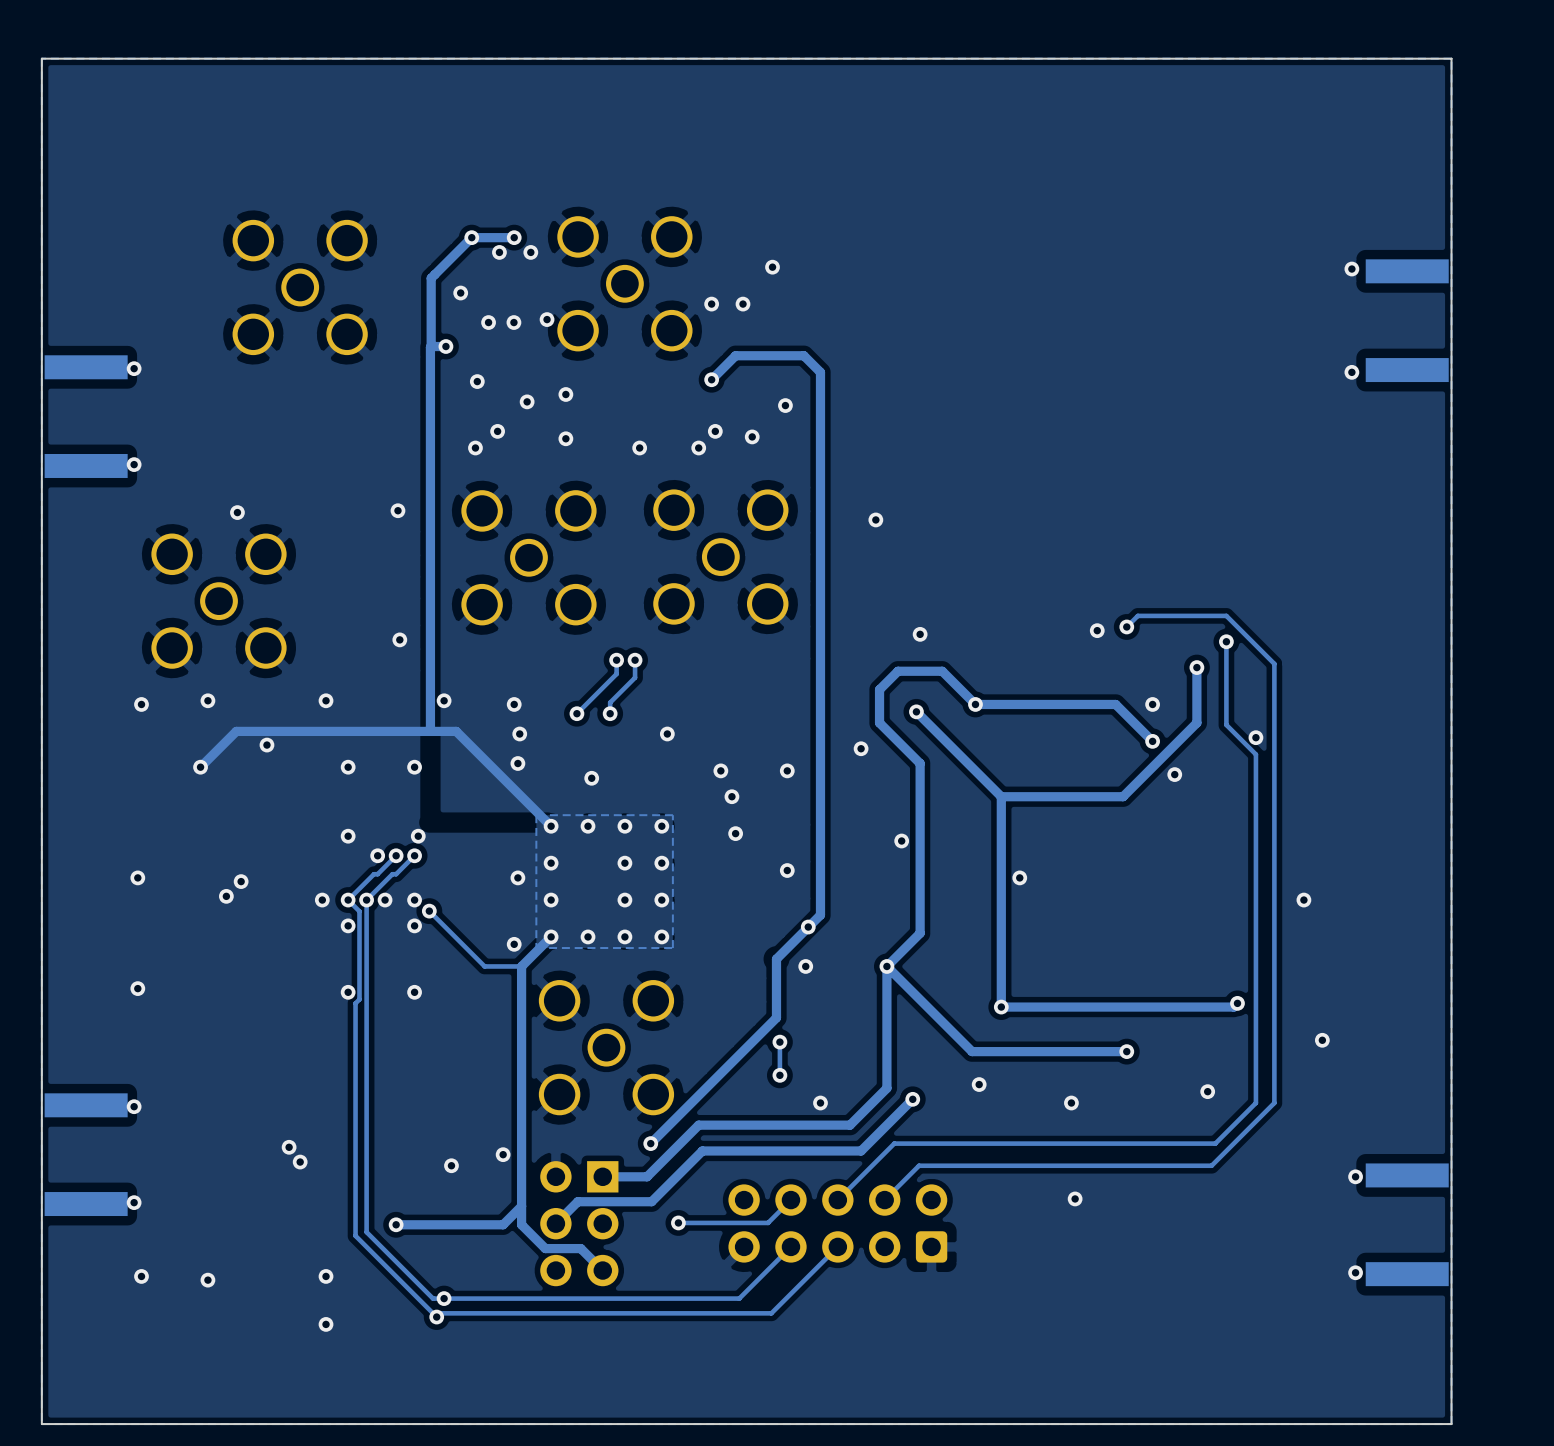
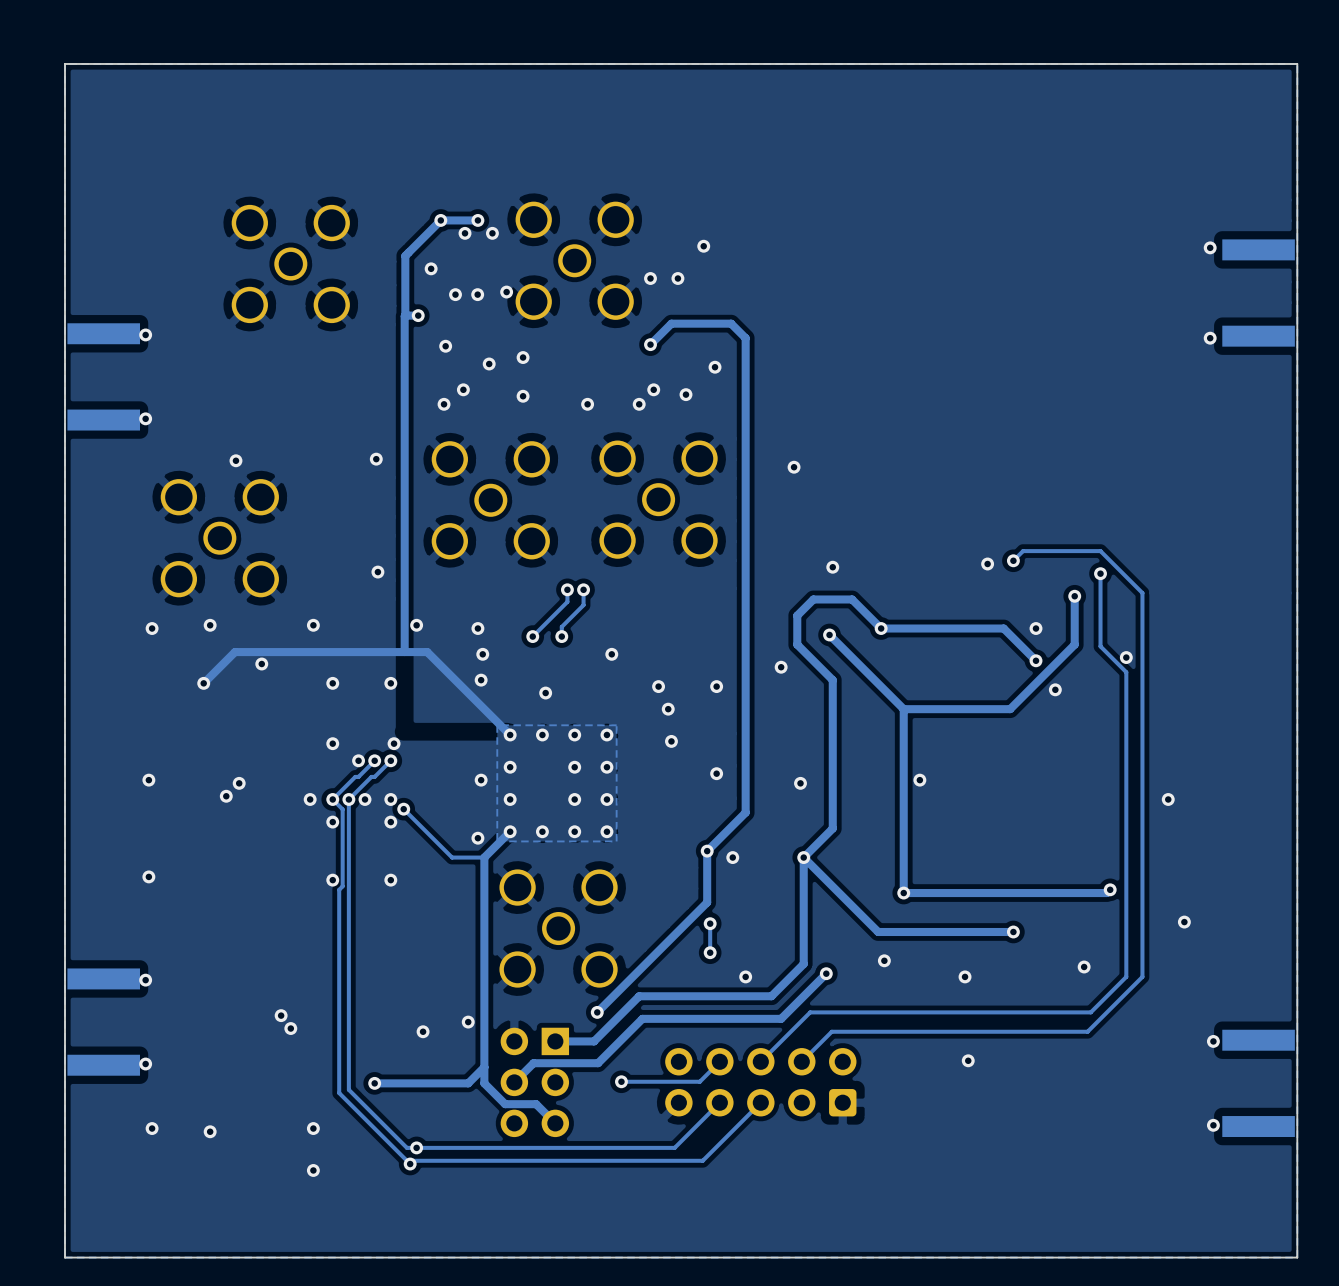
via: (901, 841) -> none
via: none -> (800, 783)
via: (808, 927) -> none
via: none -> (707, 851)

